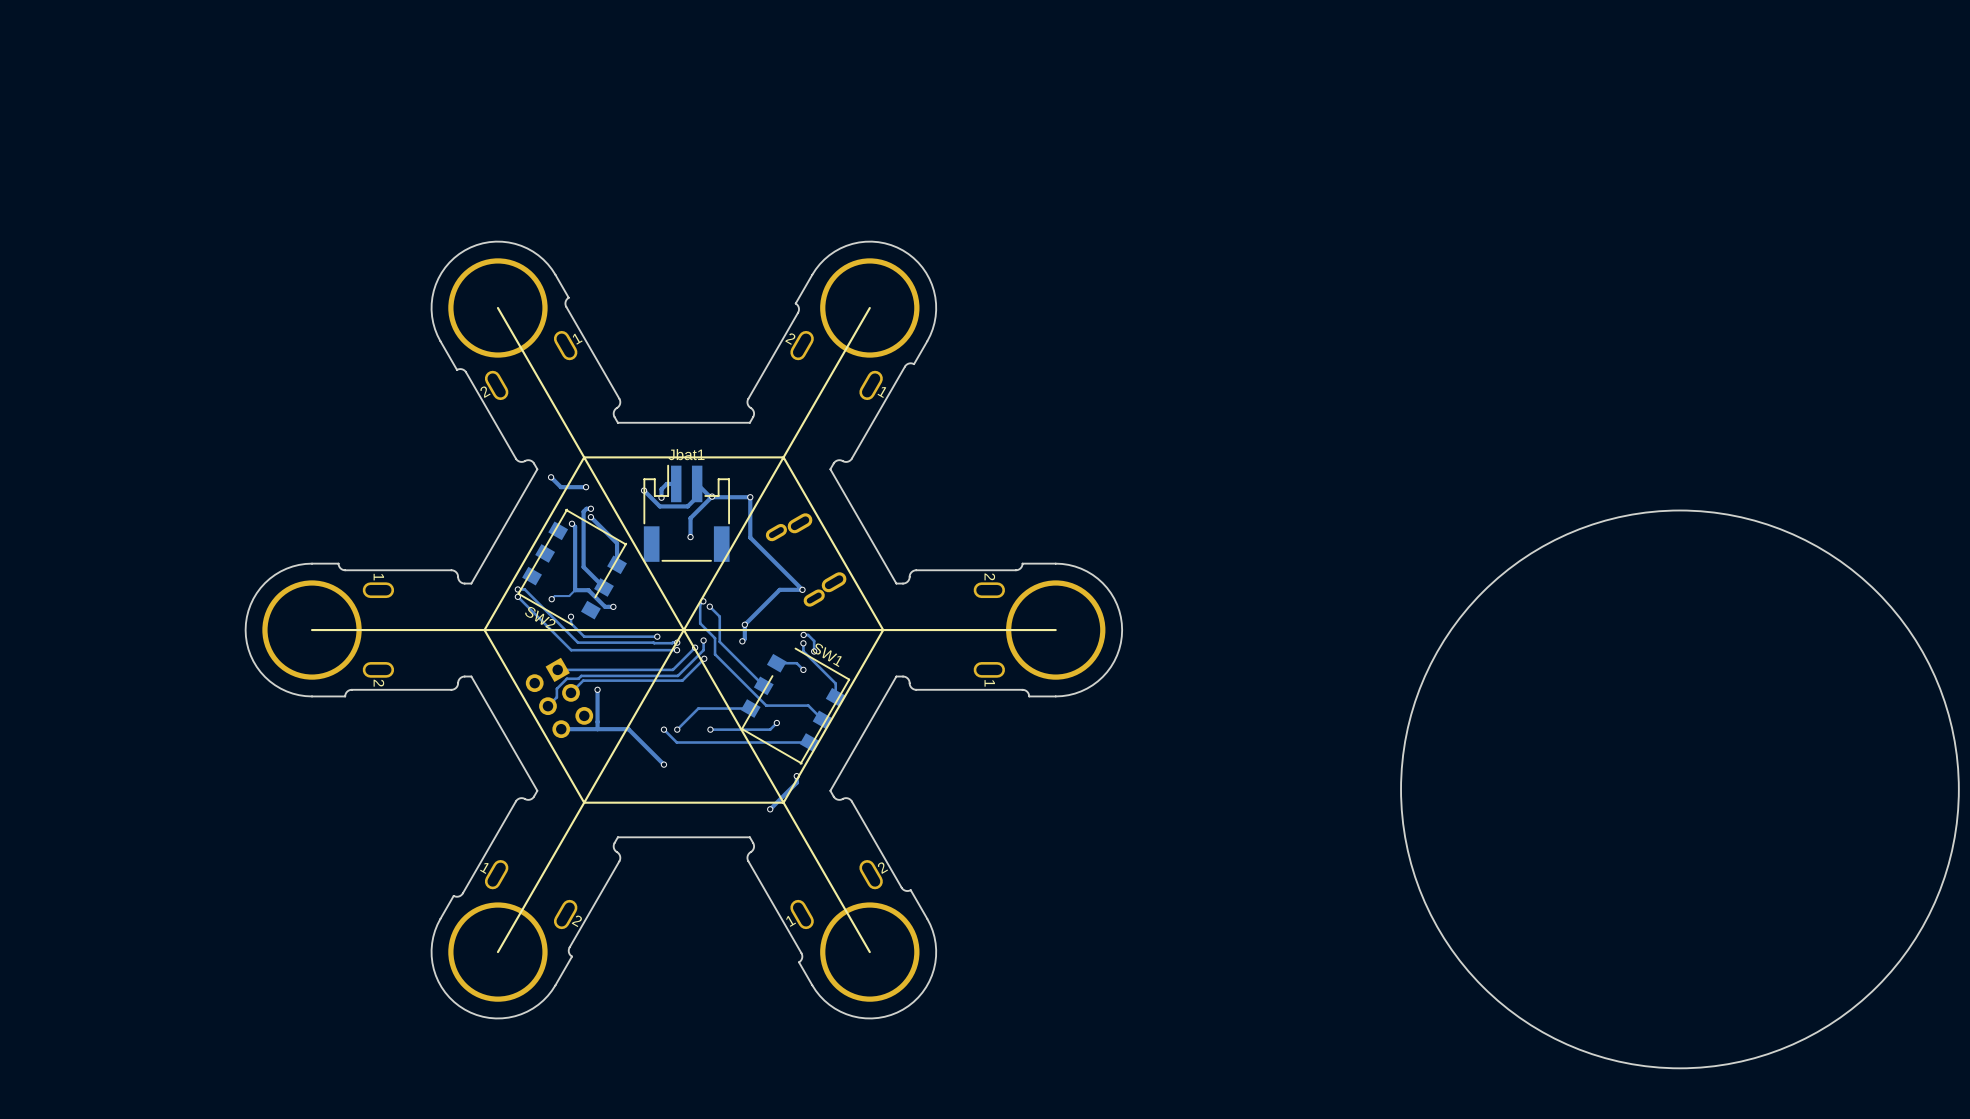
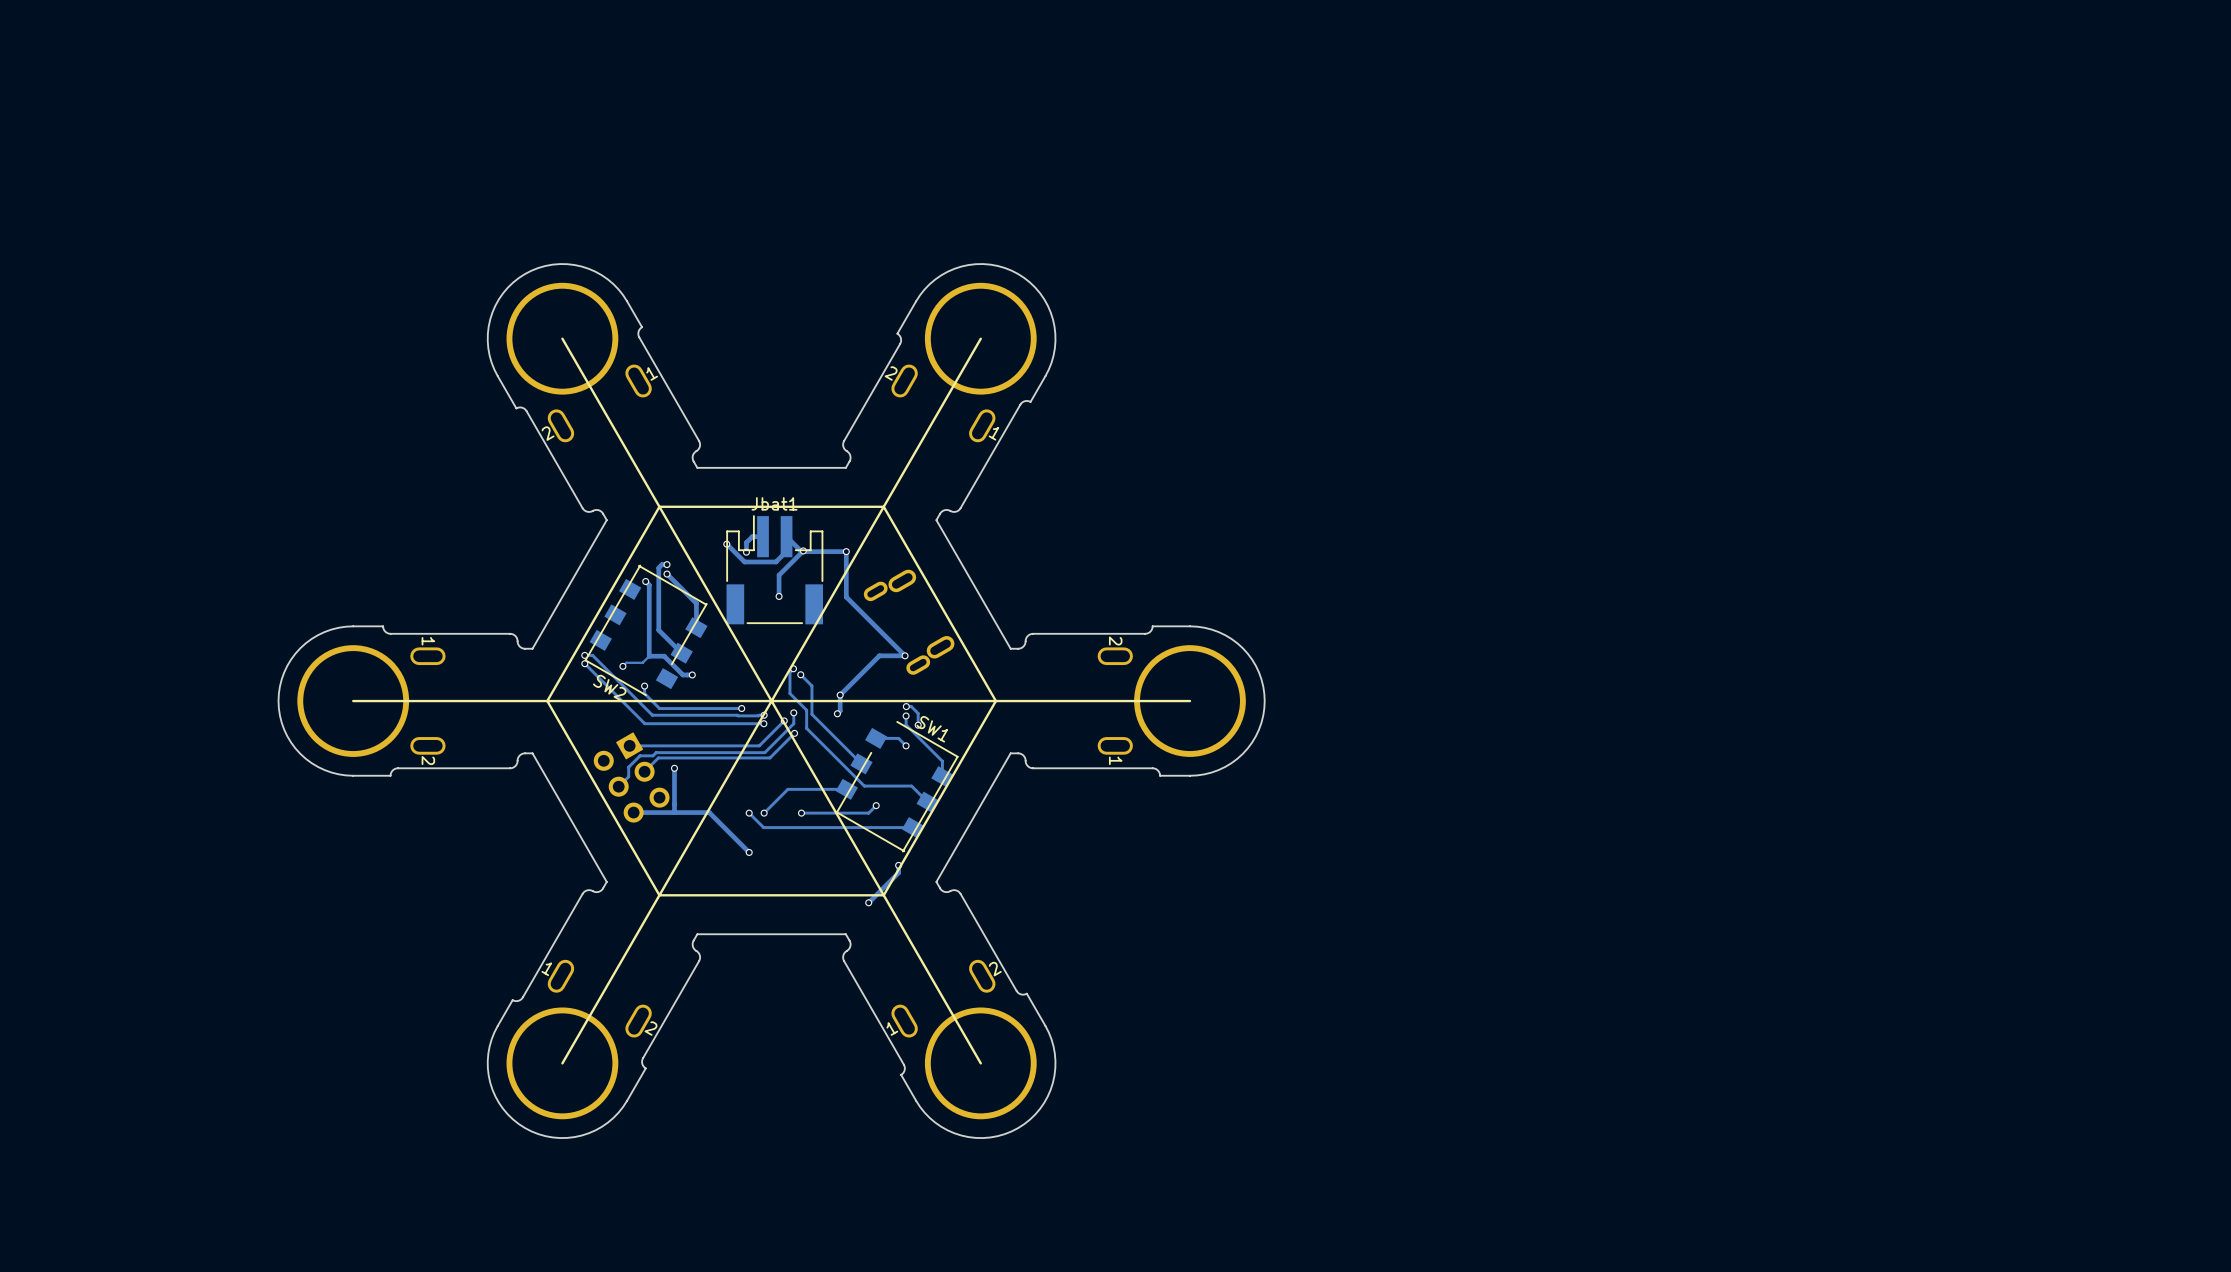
track: (551, 477) (560, 487) (586, 487) -> none
via: (551, 477) -> none
via: (586, 487) -> none
round board edge: [1400, 509, 1960, 1070] -> none

